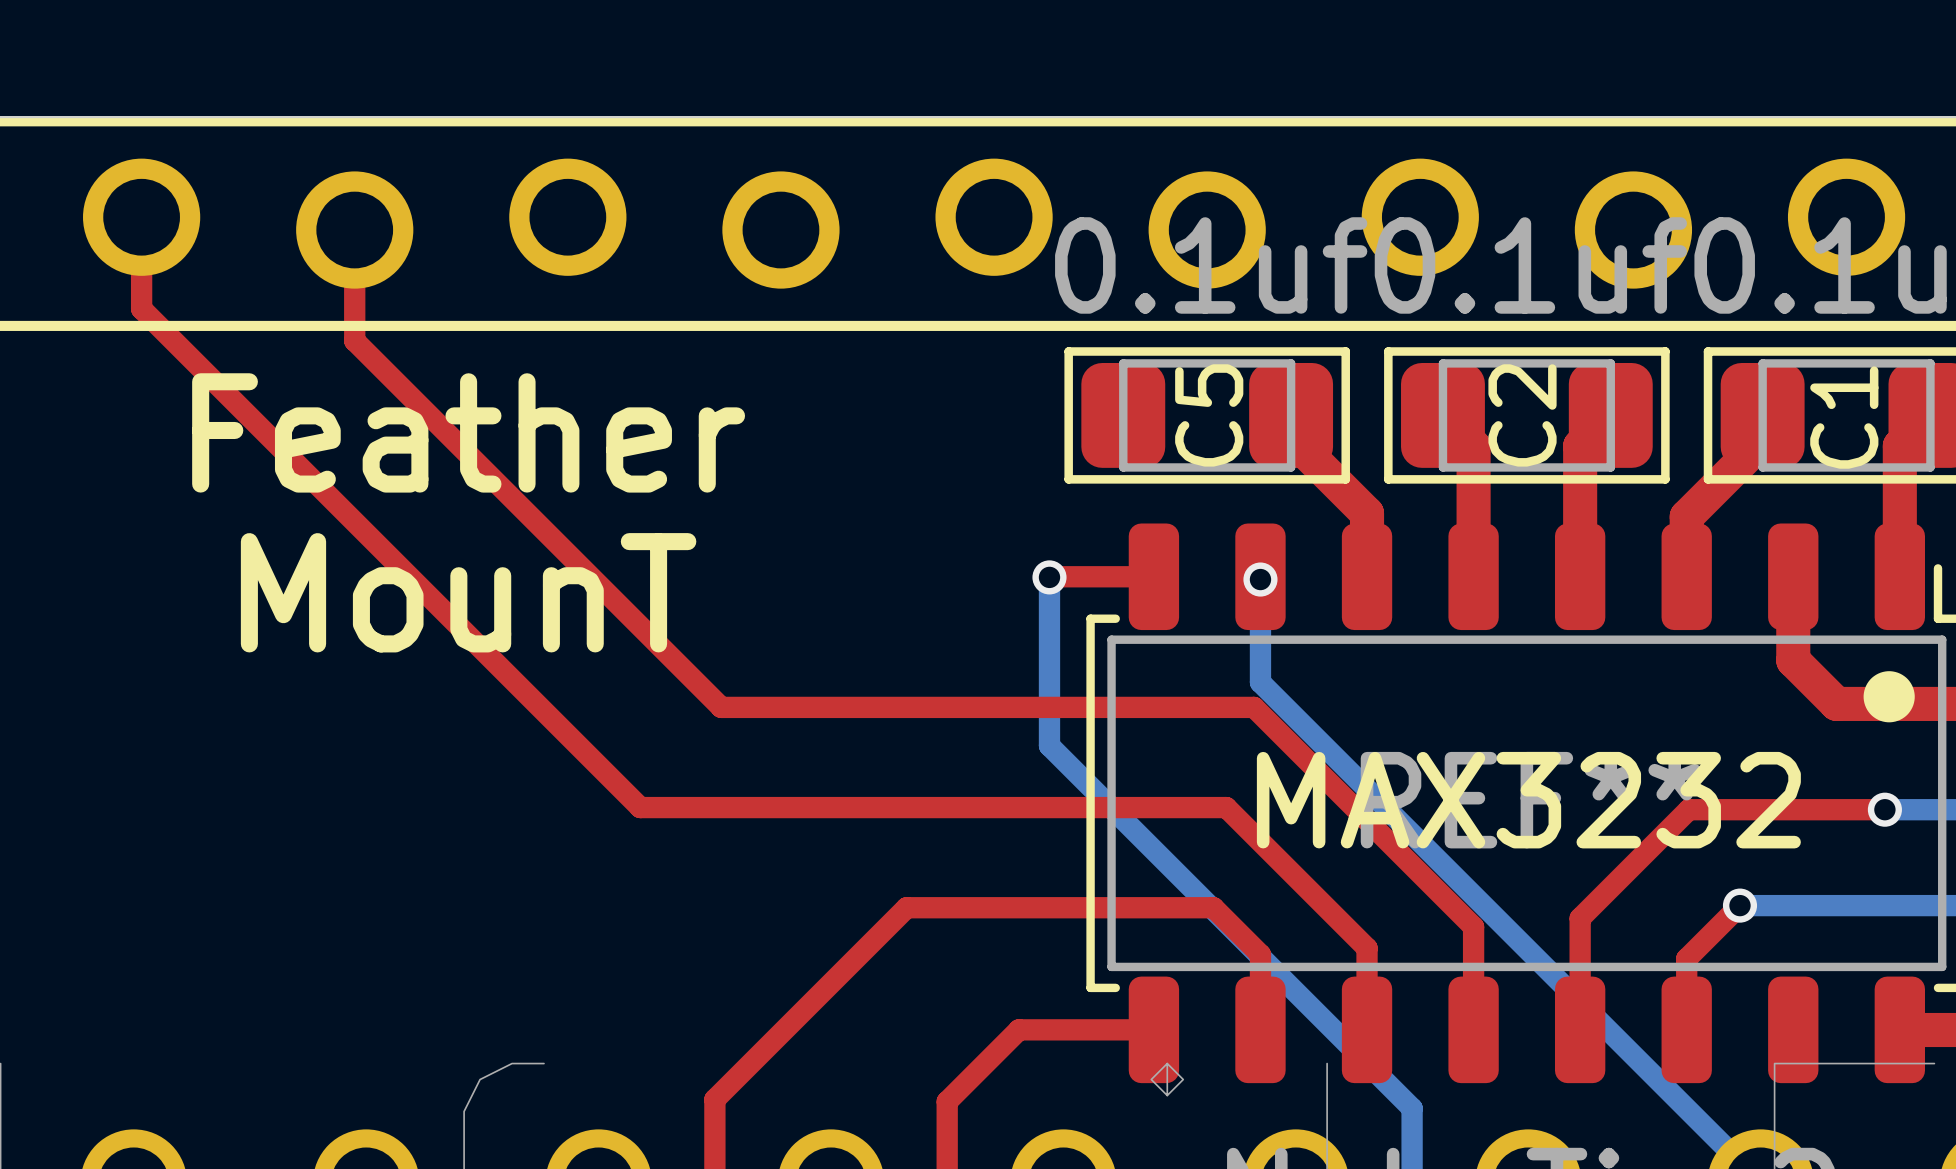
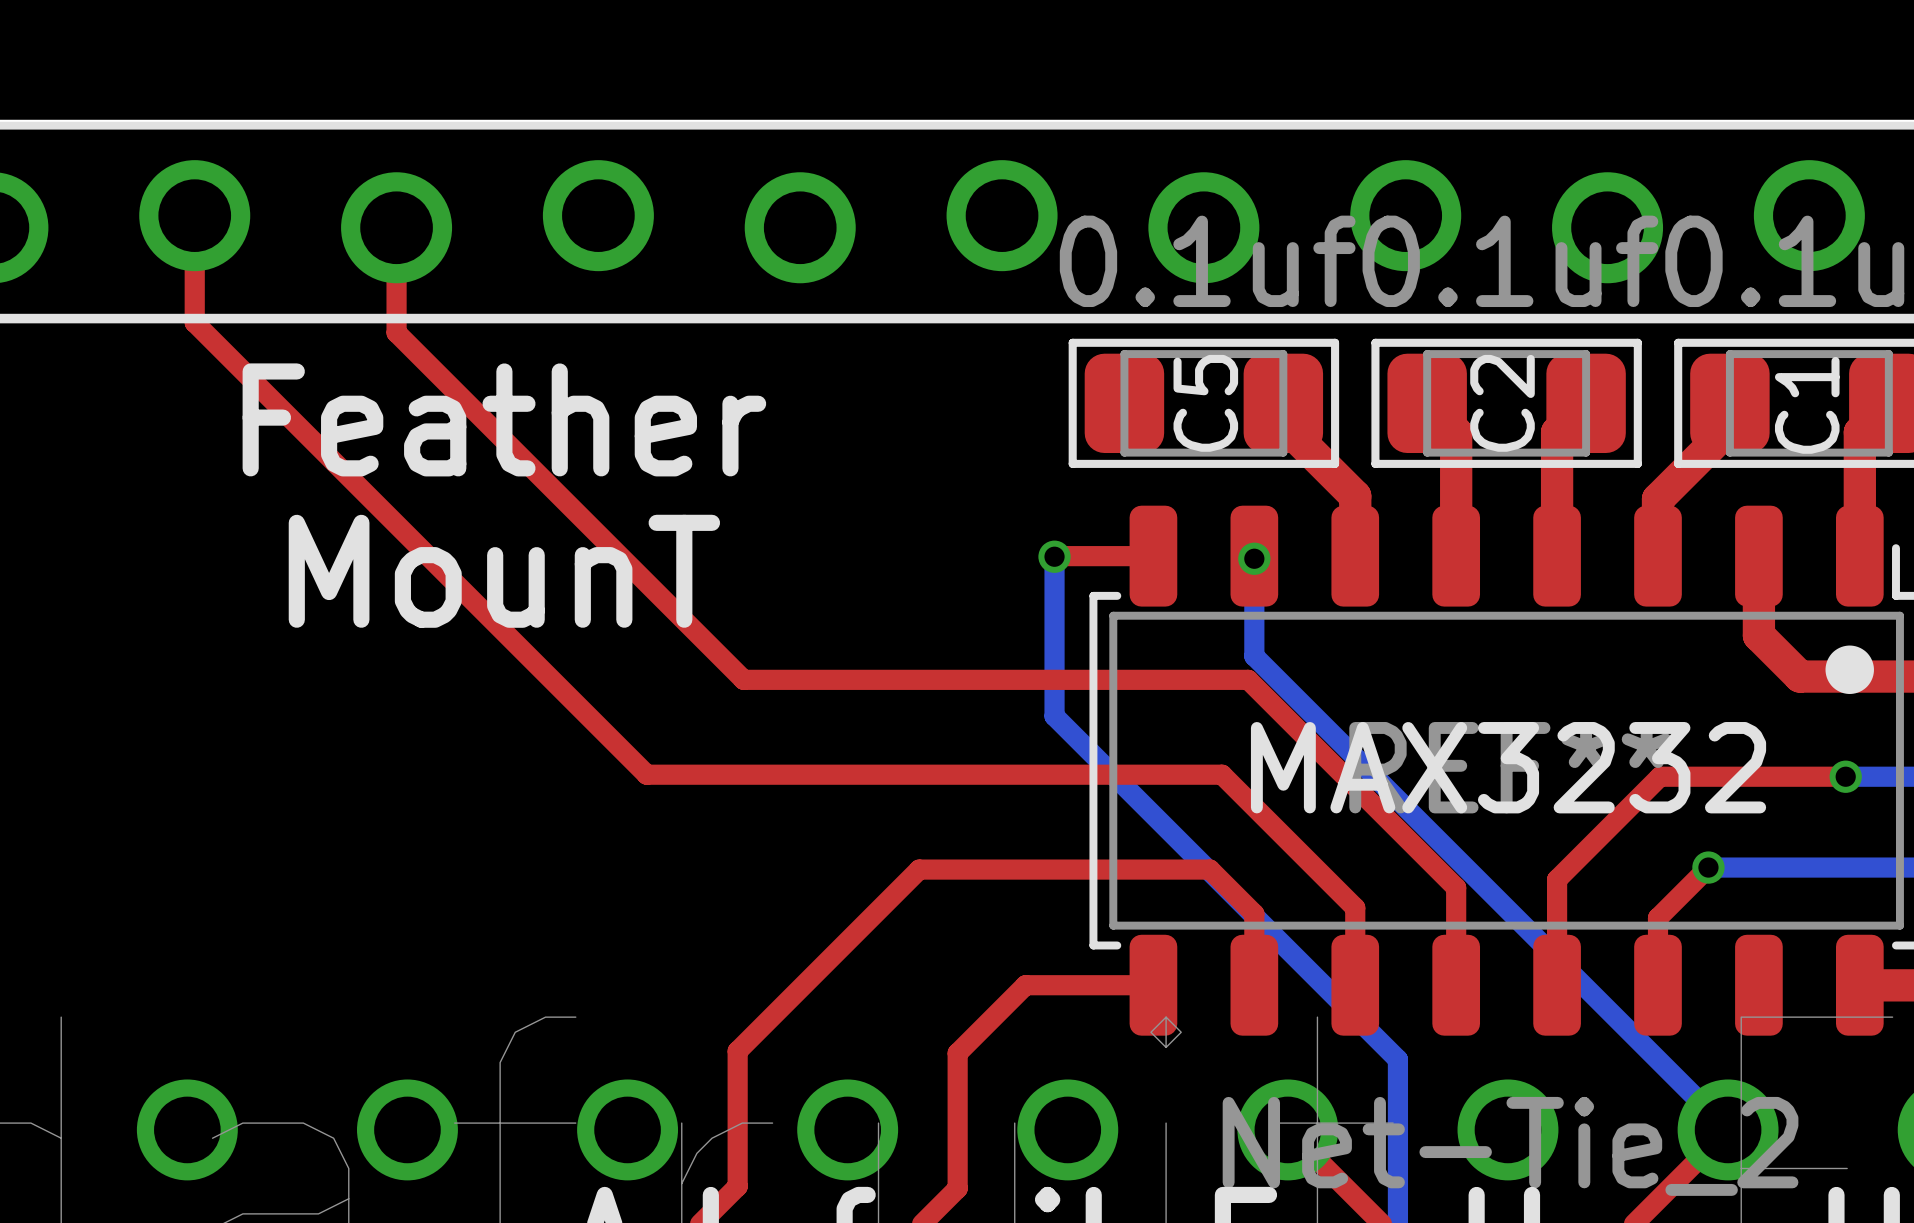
top track: (141, 308) (640, 807) -> (194, 302) (194, 322) (646, 774) (667, 774)

